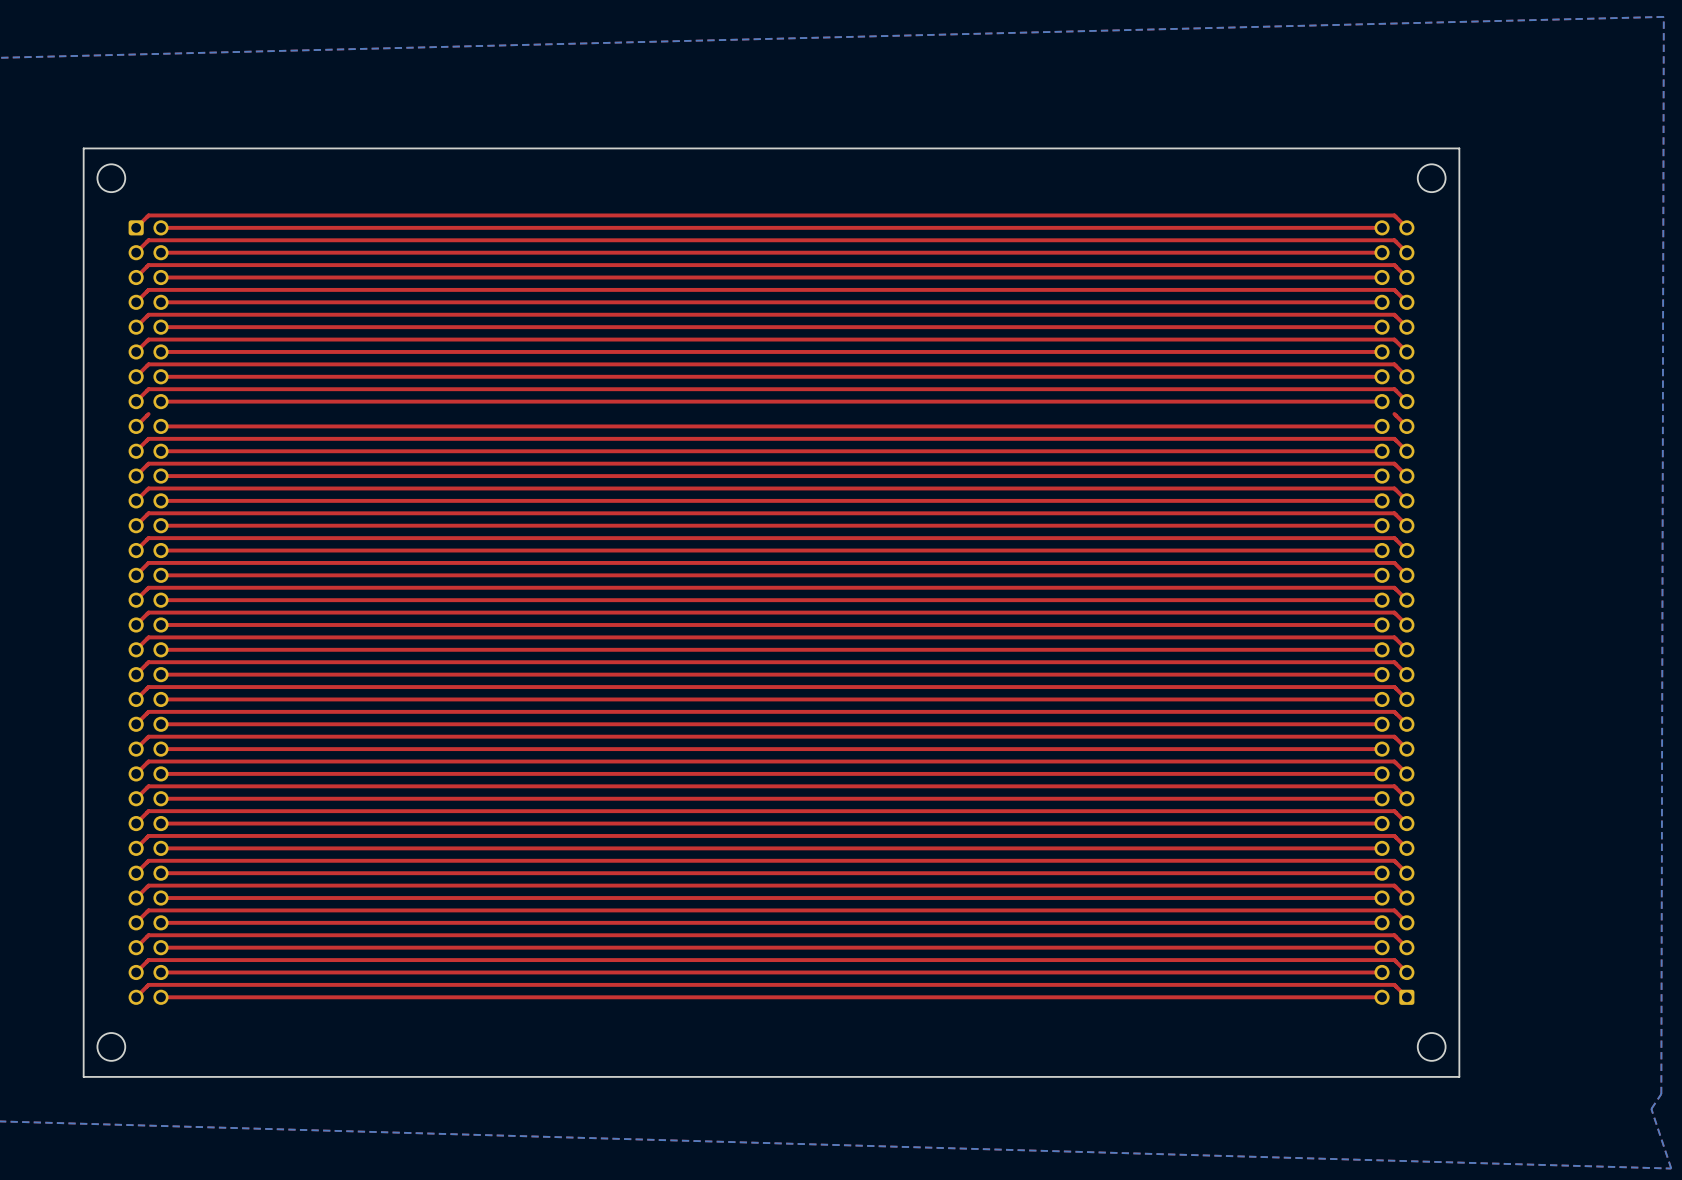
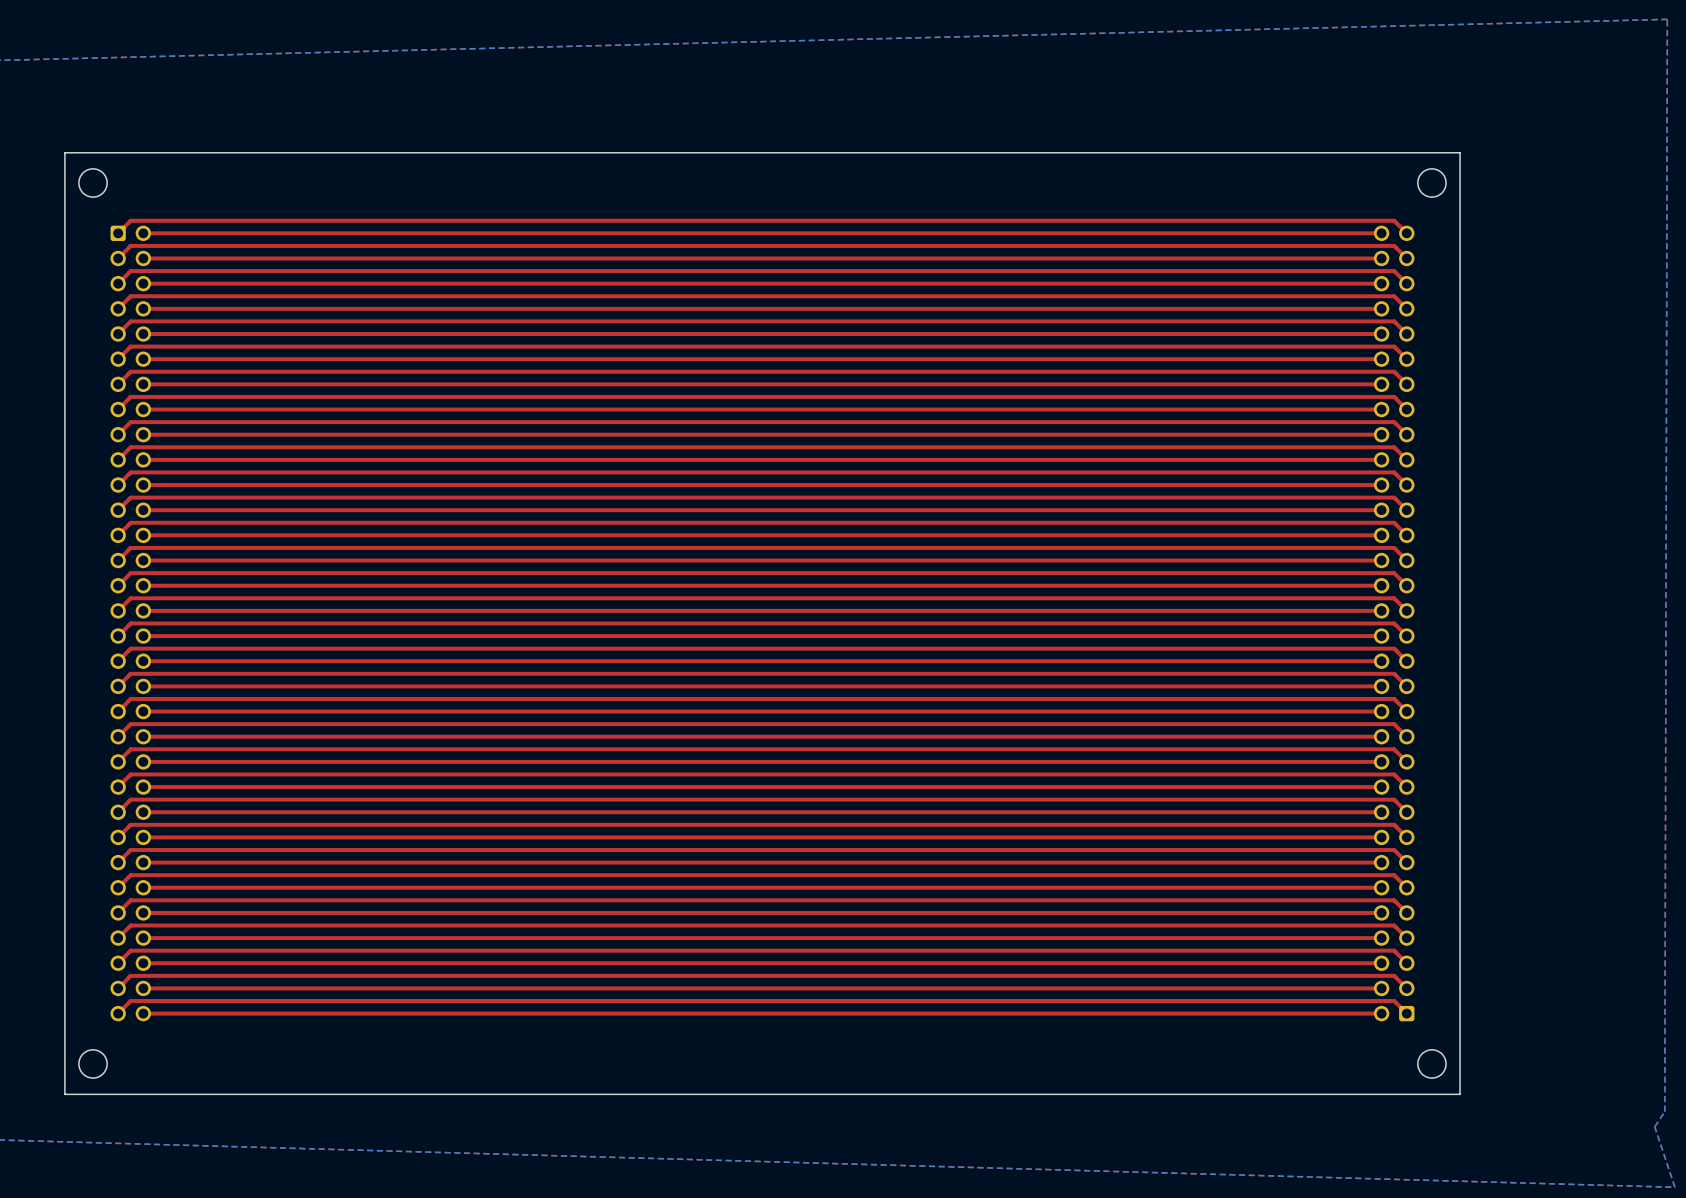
top track: none -> (1394, 422) (130, 422)

